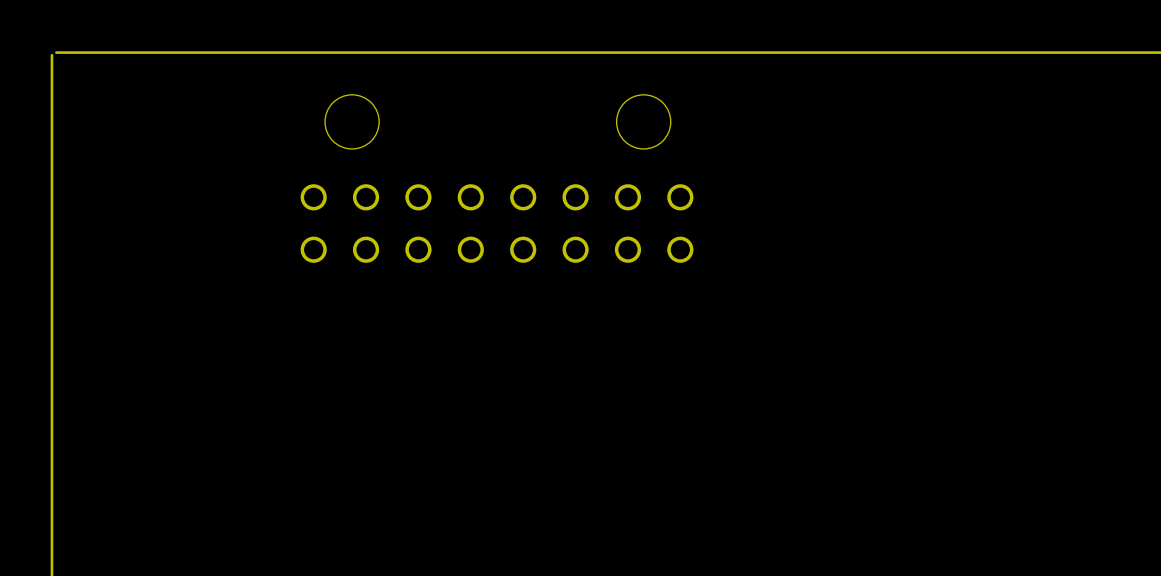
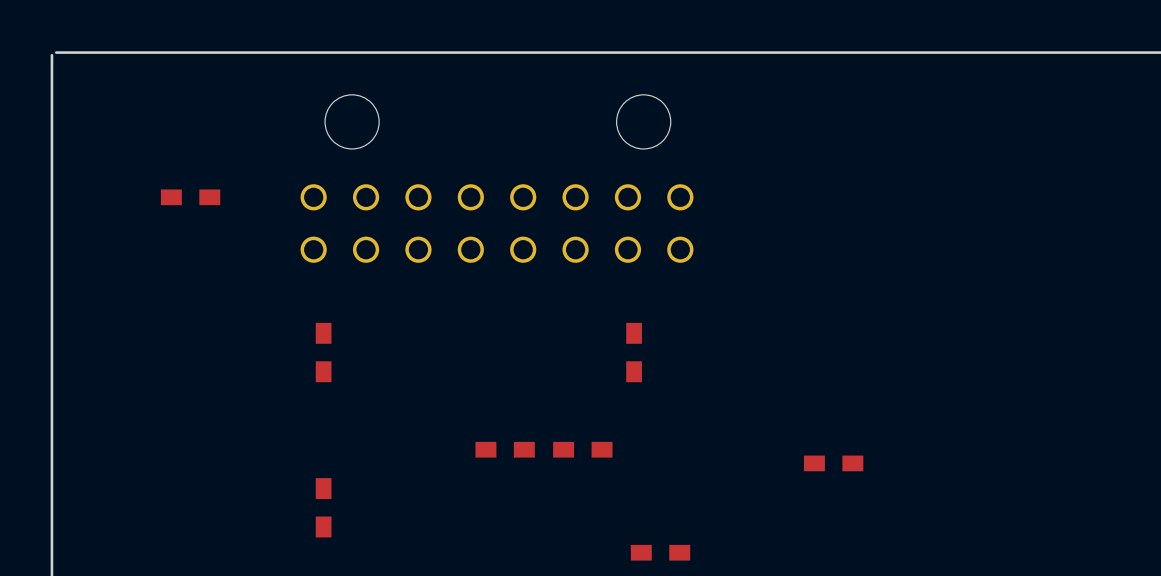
part: none -> (190, 197)
part: none -> (323, 352)
part: none -> (634, 352)
part: none -> (505, 449)
part: none -> (582, 449)
part: none -> (833, 463)
part: none -> (323, 507)
part: none -> (660, 552)

